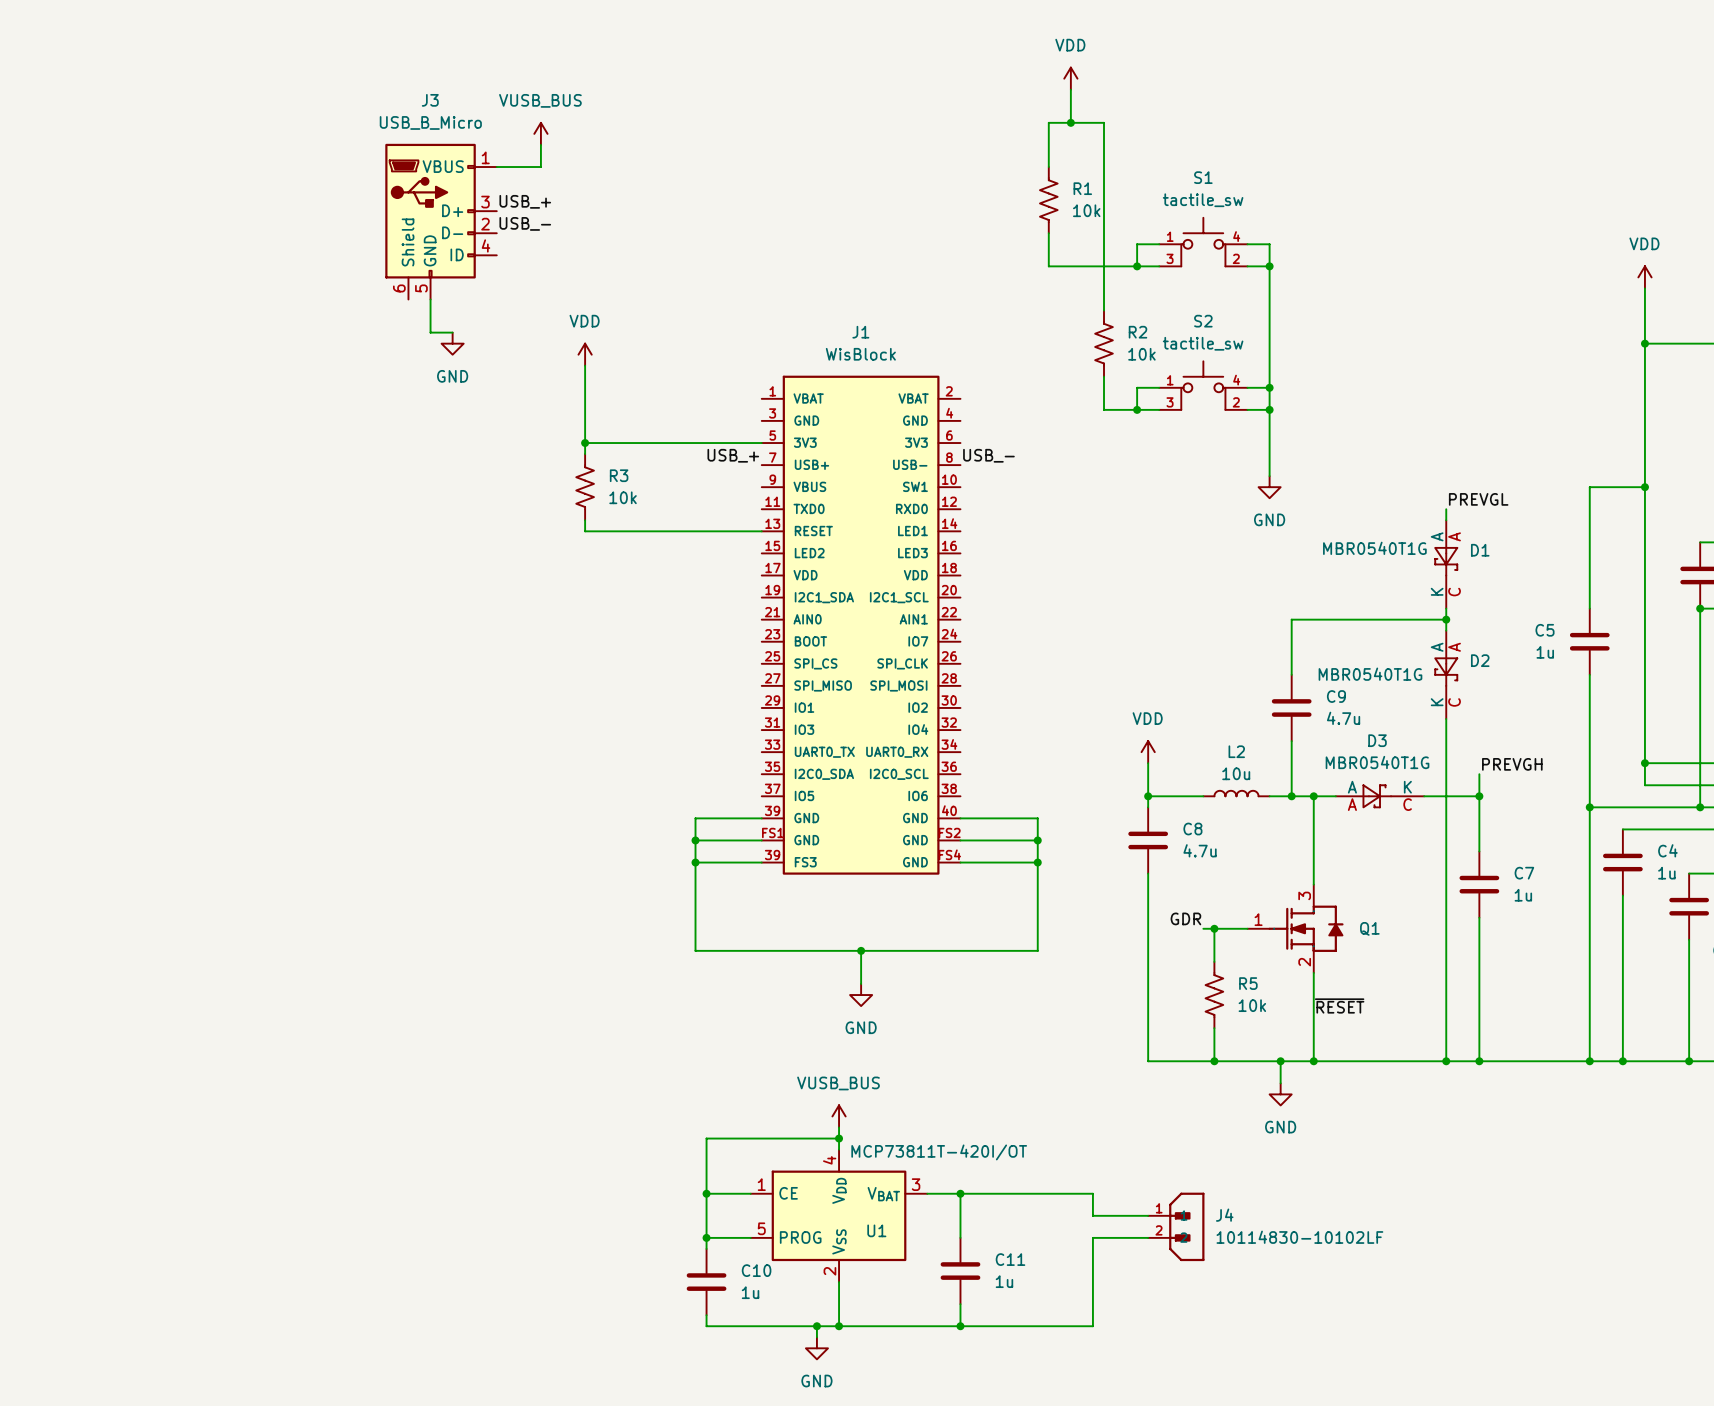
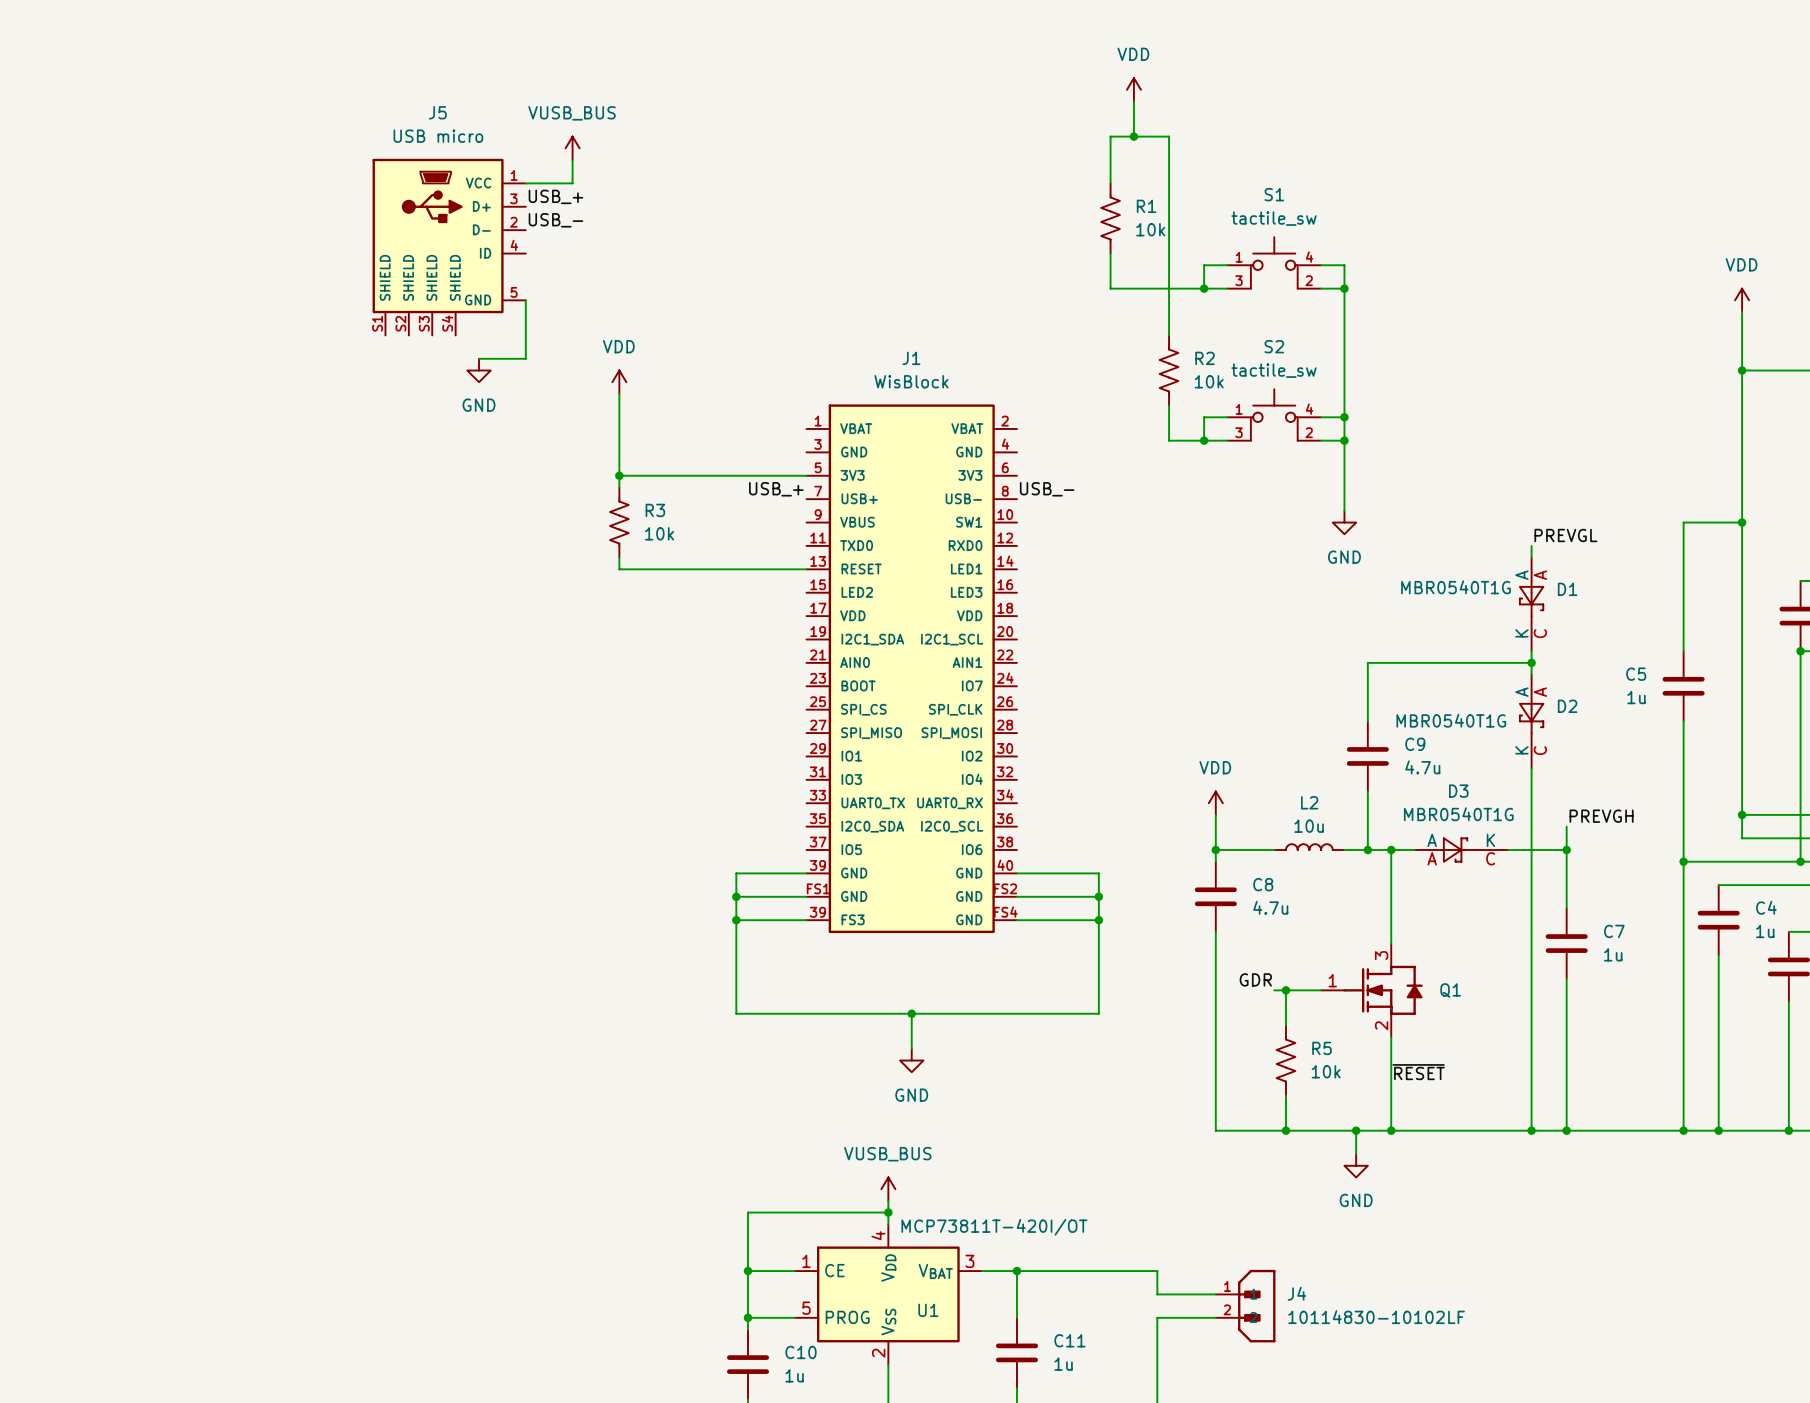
label: none -> USB_+ (555, 196)
label: USB_+ (525, 201) -> USB_- (555, 220)
J3: USB_B_Micro (441, 221) -> none
label: USB_- (525, 223) -> none
J5: none -> USB micro (449, 247)
wire: (430, 299) (430, 332) (452, 332) -> (525, 300) (525, 358) (479, 358)

